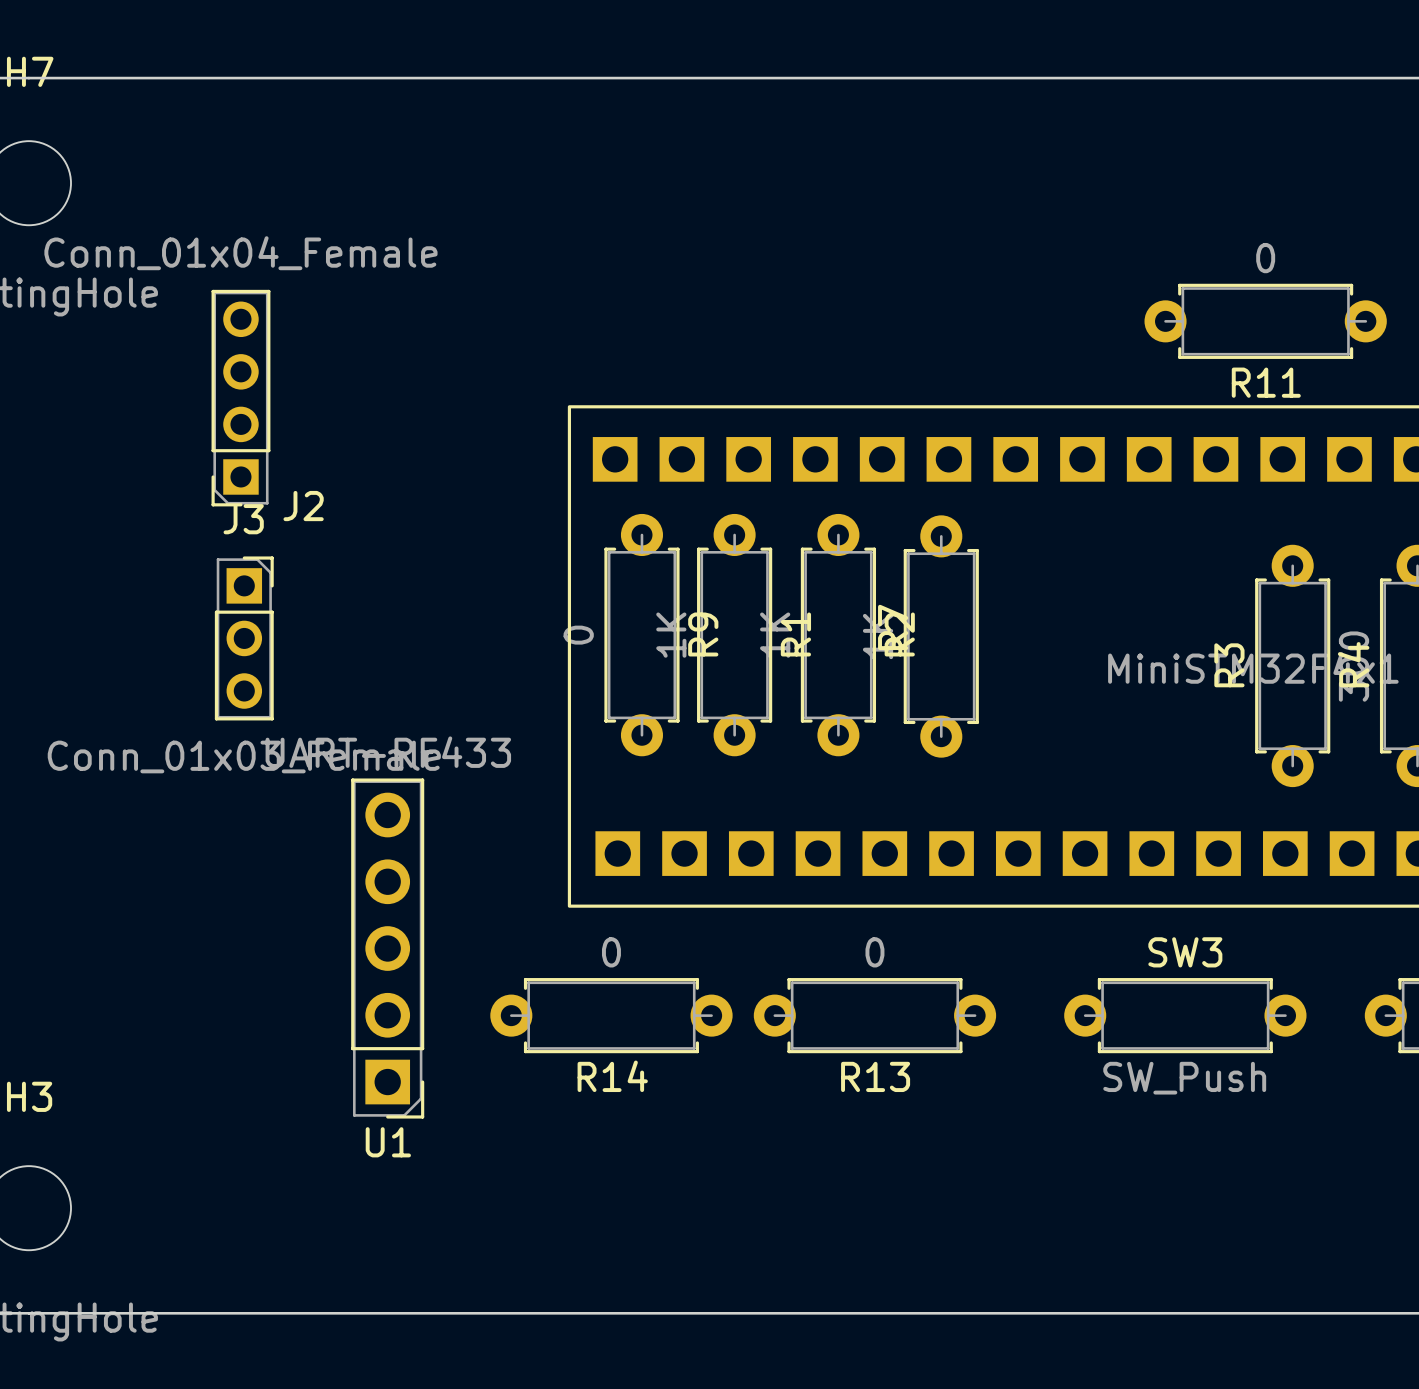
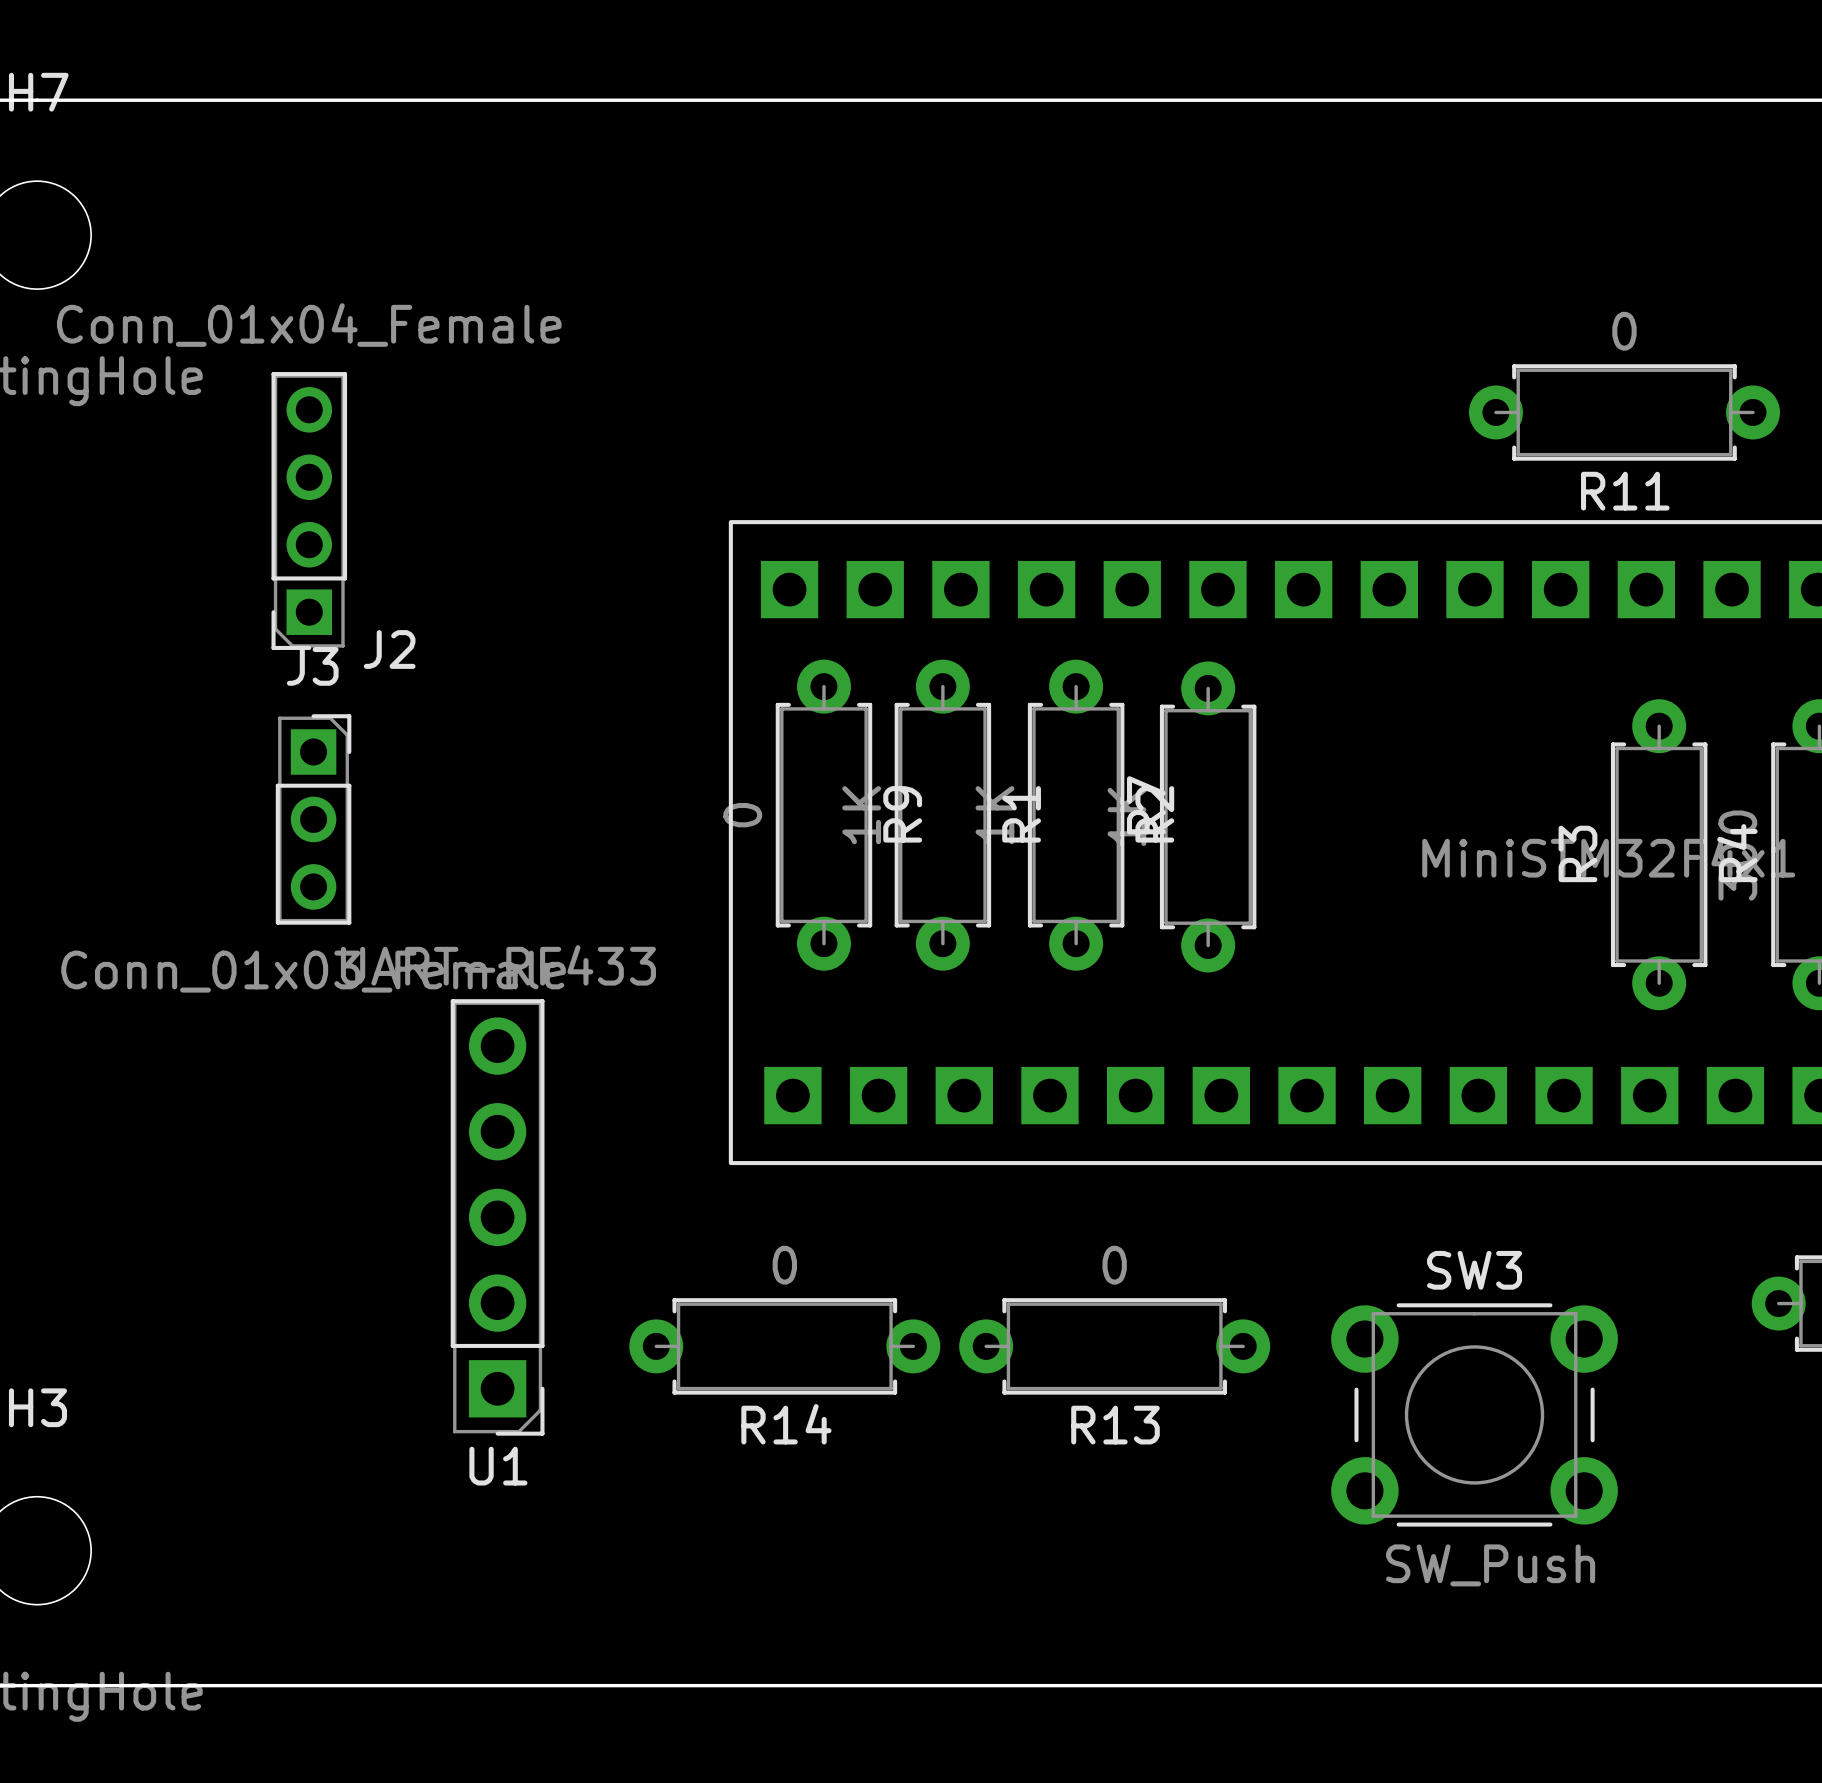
SW3 footprint: [1064, 978, 1307, 1054] -> [1331, 1303, 1618, 1527]
R14 position: (611, 1015) -> (784, 1346)
R13 position: (874, 1015) -> (1114, 1346)
SW3 value position: SW_Push (1184, 1078) -> SW_Push (1490, 1565)

